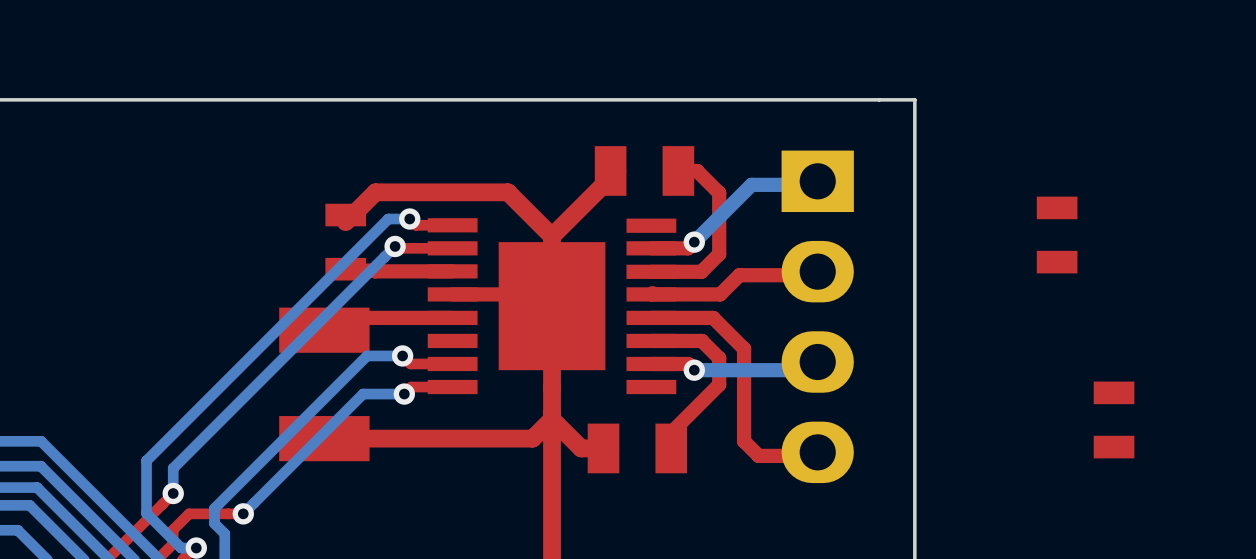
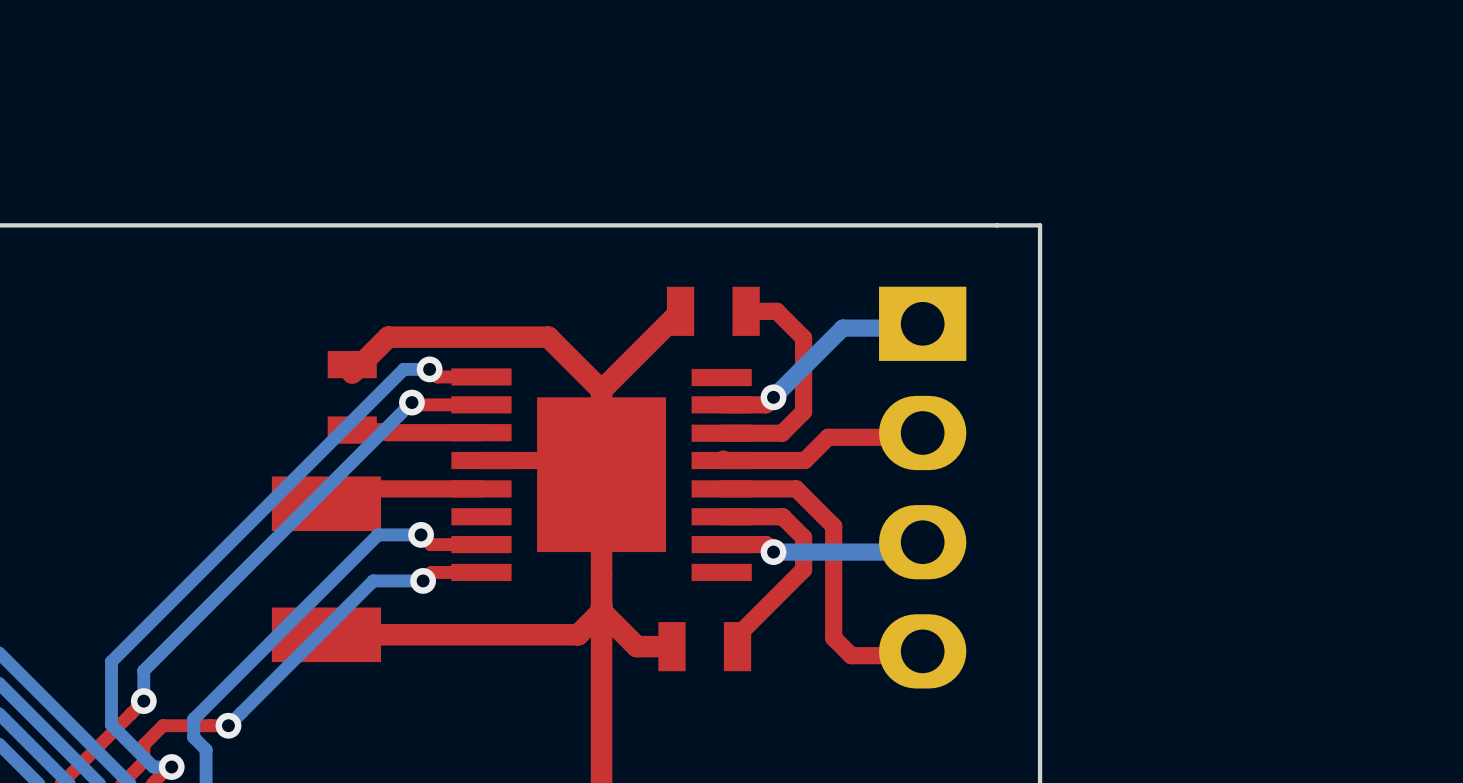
part footprint: [594, 146, 695, 196] -> [666, 286, 760, 336]
part: (1057, 235) -> none
part: (1114, 419) -> none
part footprint: [587, 423, 688, 474] -> [658, 622, 752, 672]

